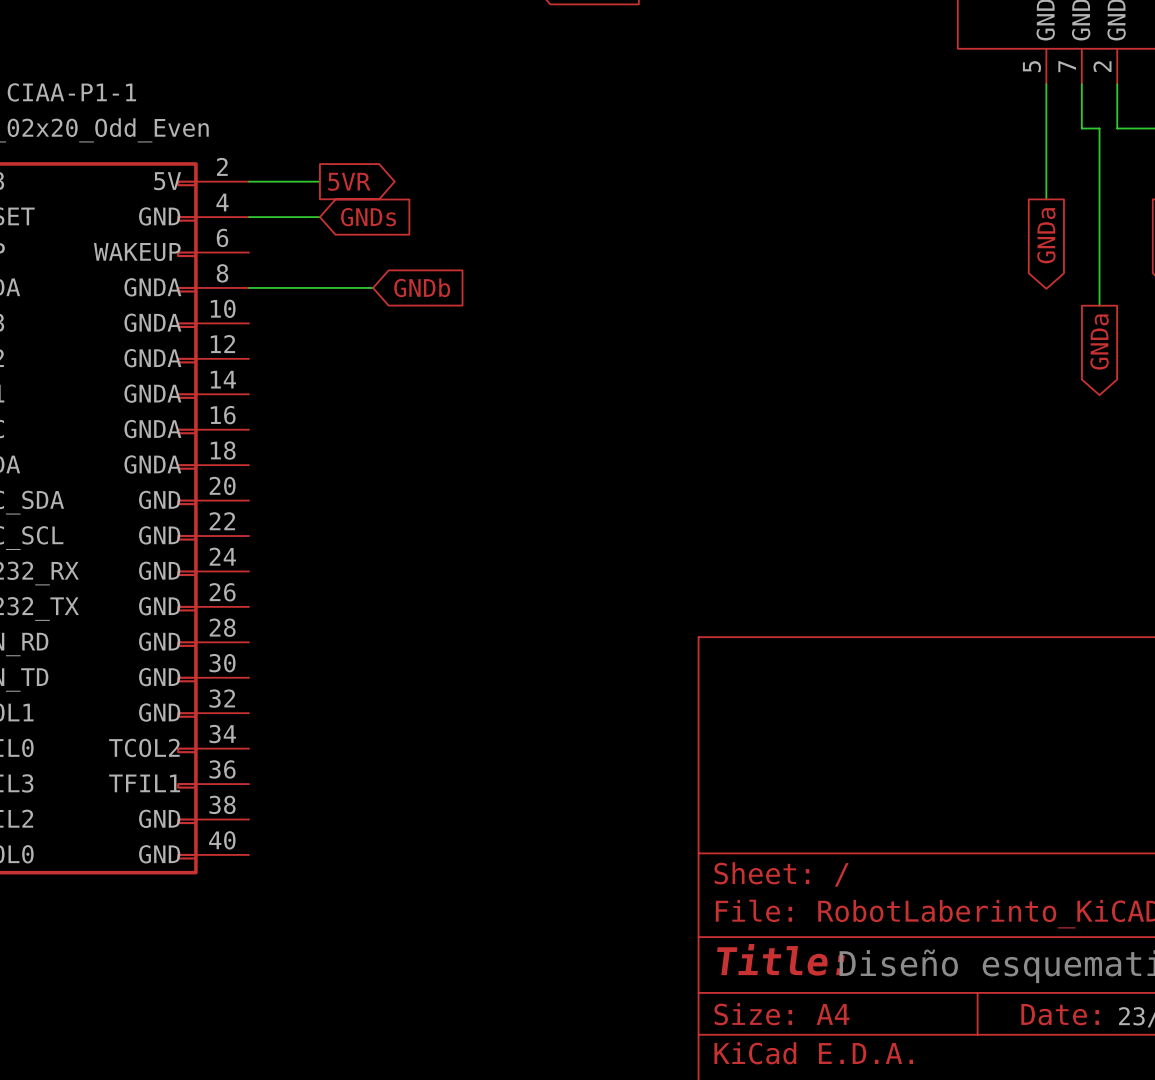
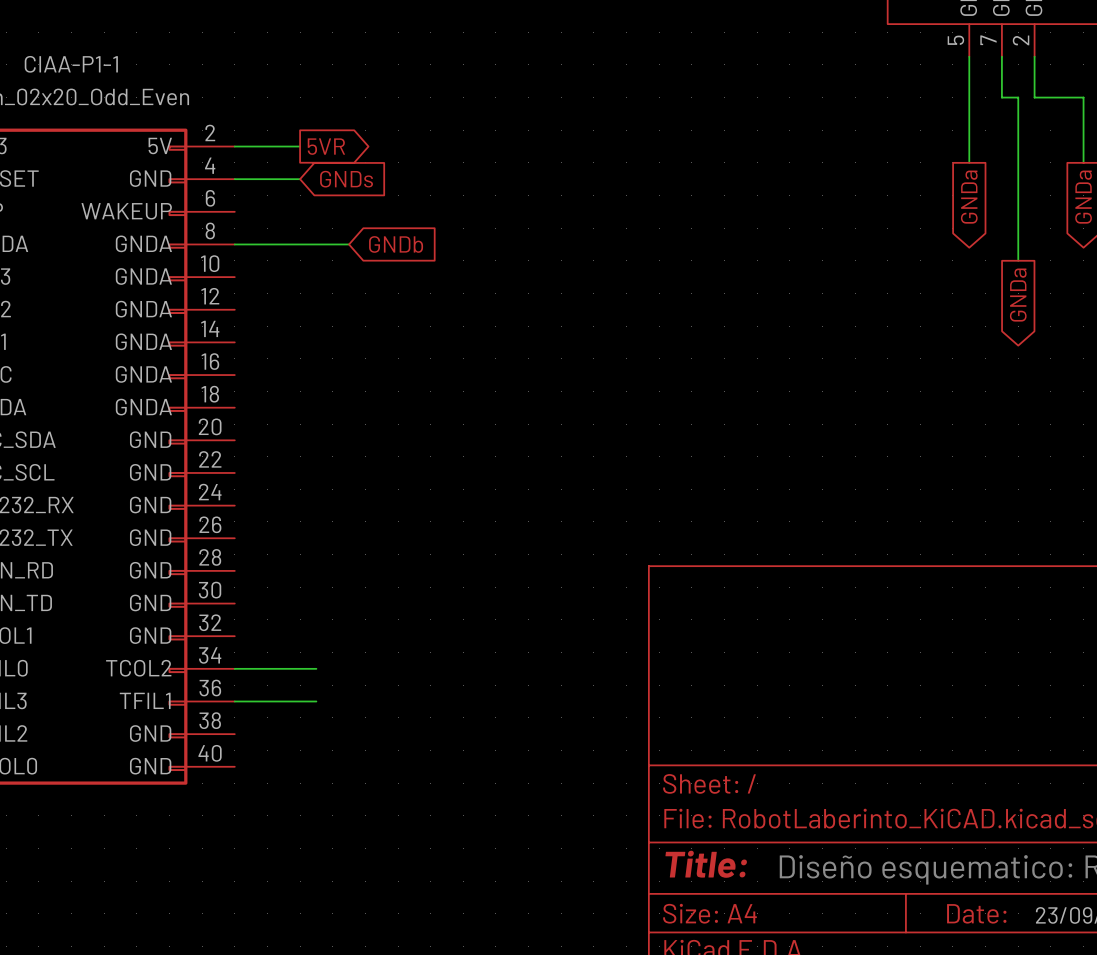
wire: none -> (234, 668) (316, 668)
wire: none -> (234, 701) (316, 701)

